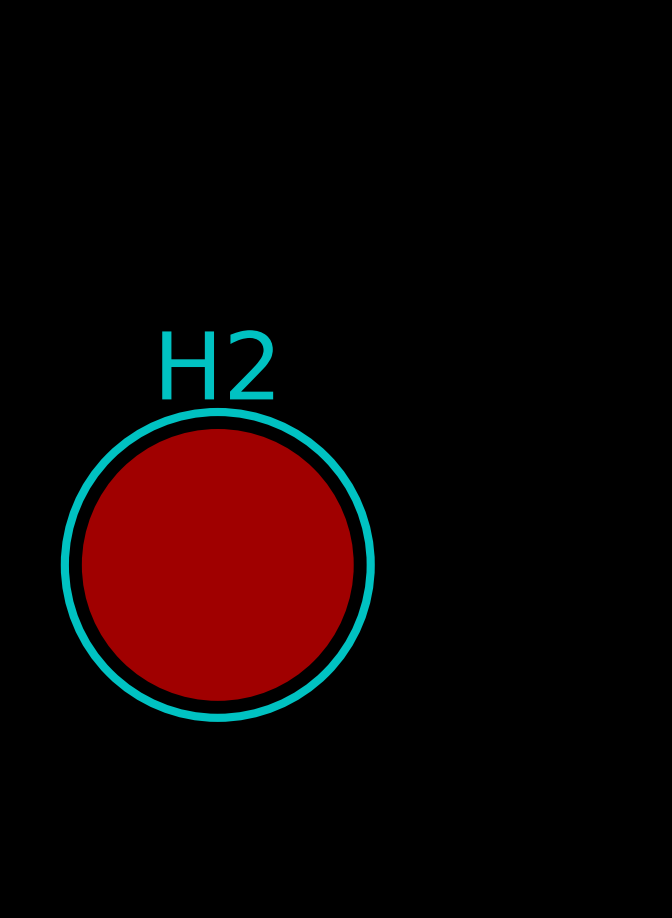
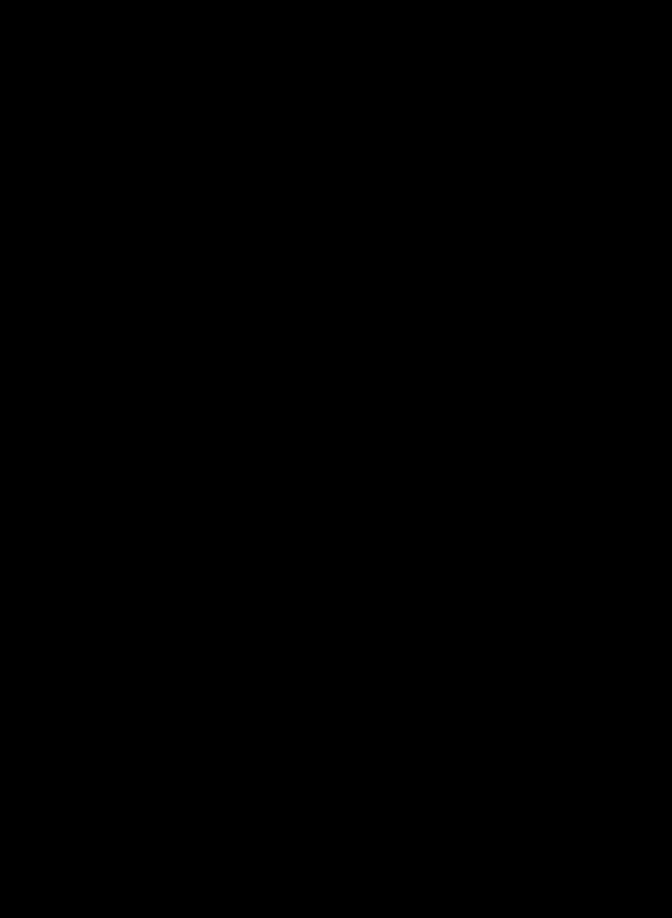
H2: (217, 564) -> none

